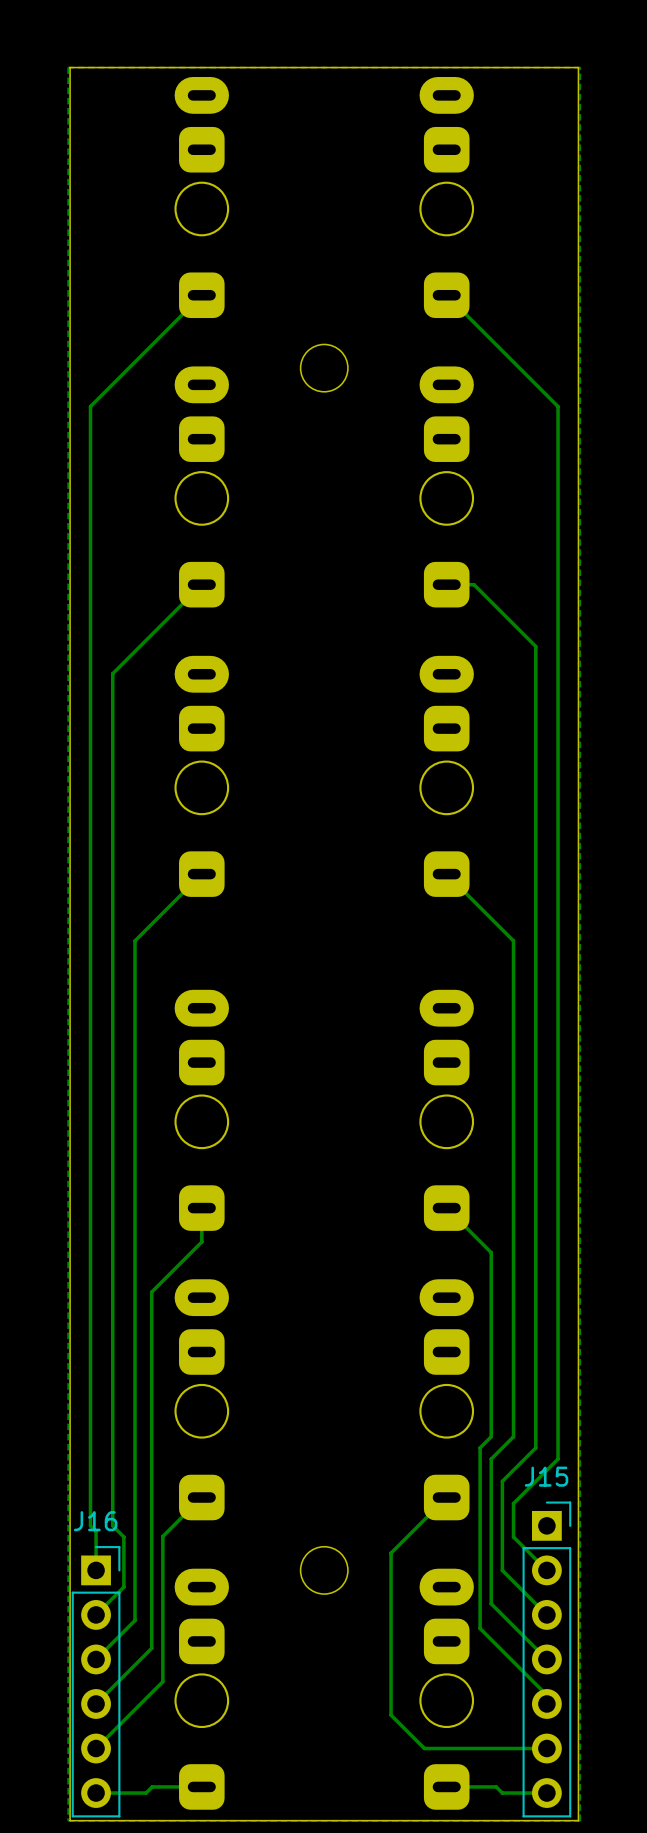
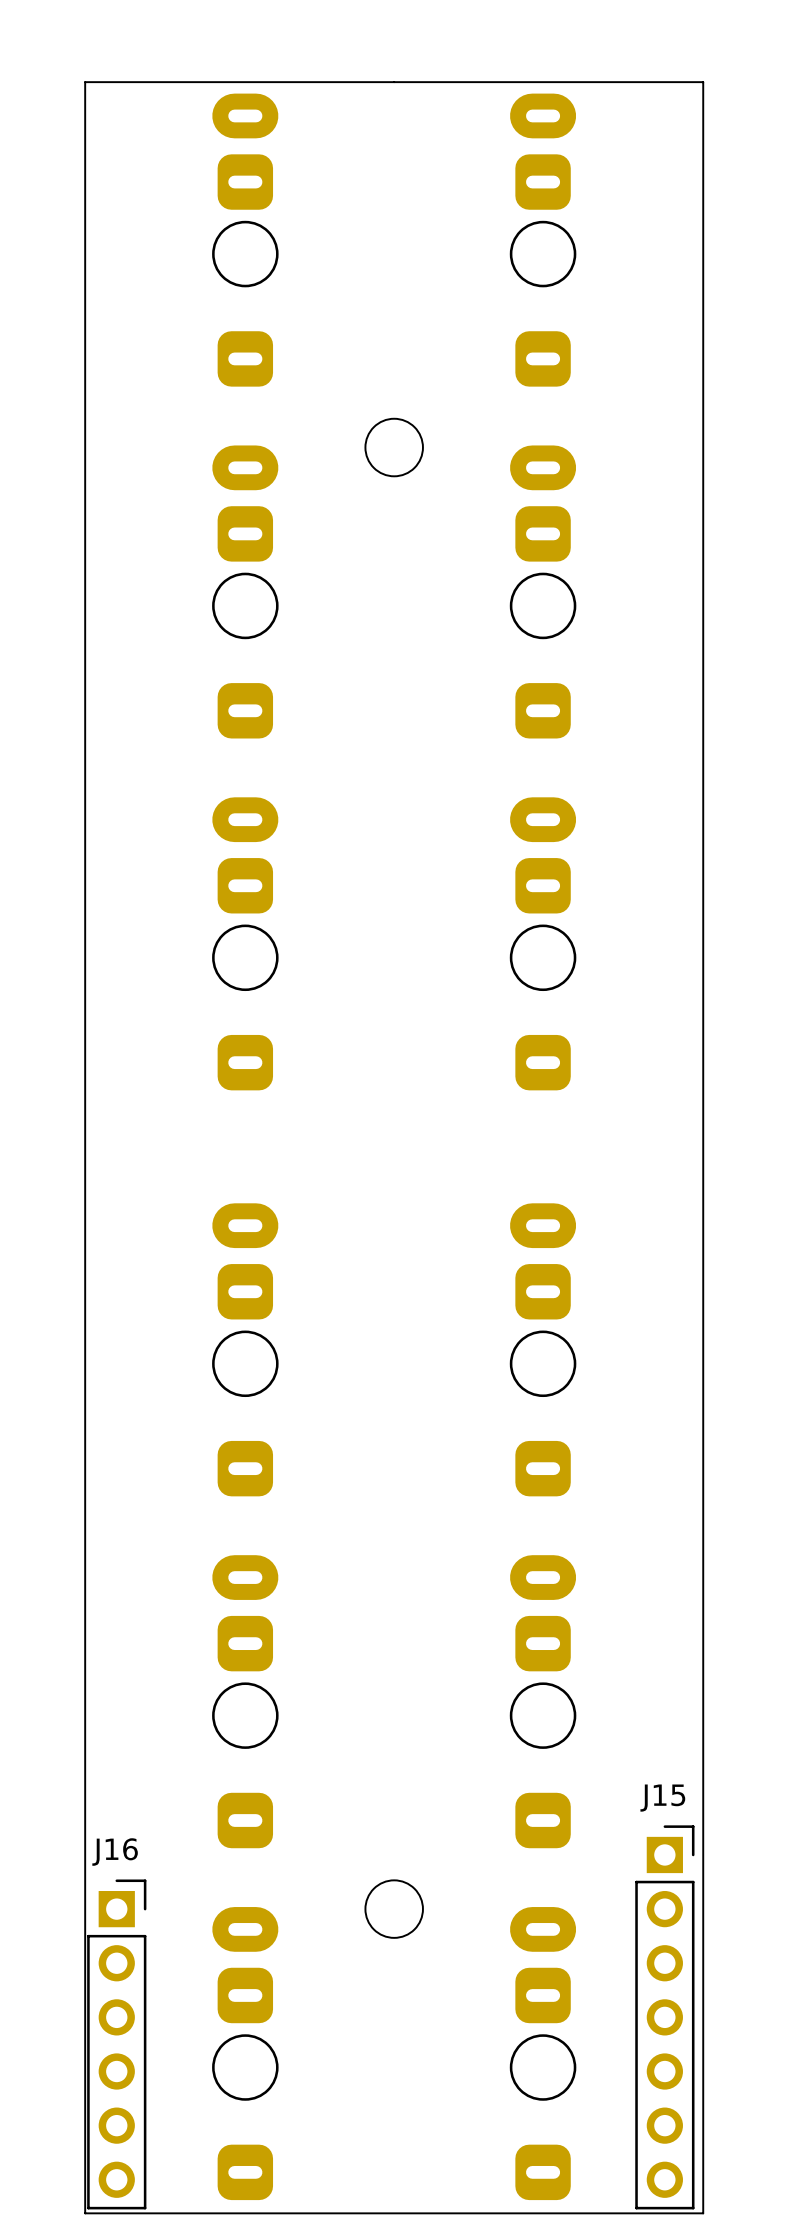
bottom zone outline: (580, 67) (68, 67) (68, 1820) (580, 1820) (580, 67) -> none
bottom track: (201, 295) (90, 406) (90, 1525) (96, 1531) (96, 1570) -> none
bottom track: (446, 295) (558, 406) (558, 1459) (513, 1503) (513, 1537) (546, 1570) -> none
bottom track: (201, 584) (112, 673) (112, 1525) (123, 1537) (123, 1587) (96, 1614) -> none
bottom track: (446, 584) (474, 584) (535, 646) (535, 1447) (502, 1481) (502, 1570) (546, 1614) -> none
bottom track: (201, 874) (135, 940) (135, 1620) (96, 1659) -> none
bottom track: (446, 874) (513, 940) (513, 1436) (491, 1459) (491, 1603) (546, 1659) -> none
bottom track: (201, 1208) (201, 1242) (151, 1292) (151, 1648) (96, 1703) -> none
bottom track: (446, 1208) (491, 1252) (491, 1436) (480, 1447) (480, 1628) (546, 1695) (546, 1703) -> none
bottom track: (201, 1497) (162, 1536) (162, 1681) (96, 1748) -> none
bottom track: (446, 1497) (391, 1553) (391, 1715) (424, 1748) (546, 1748) -> none
bottom track: (201, 1786) (152, 1786) (146, 1793) (96, 1793) -> none
bottom track: (446, 1786) (496, 1786) (502, 1793) (546, 1793) -> none

